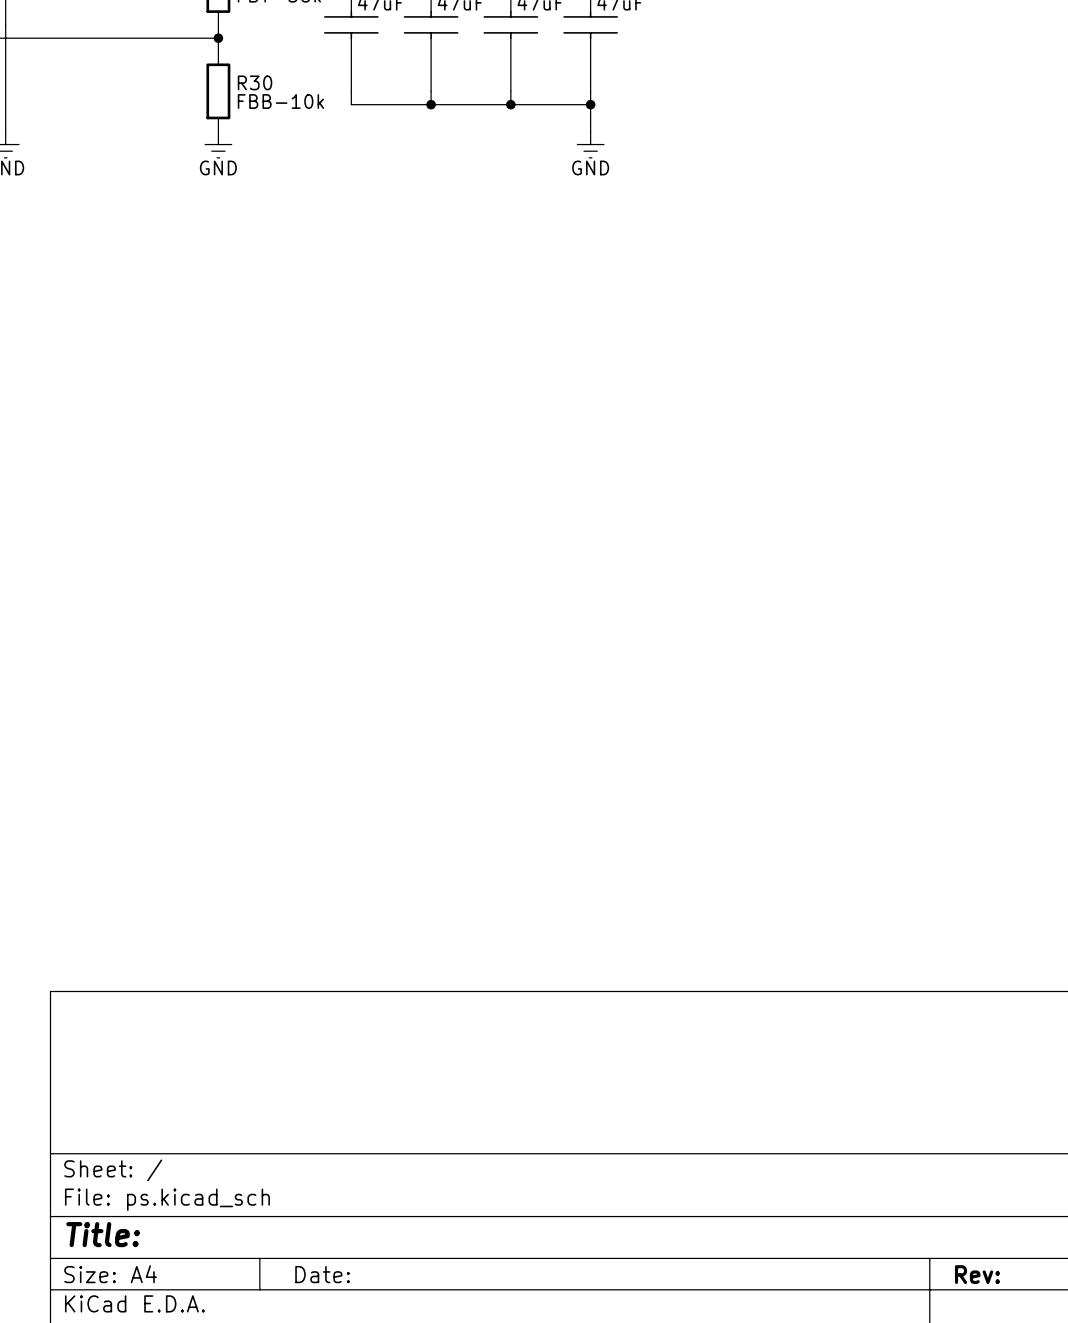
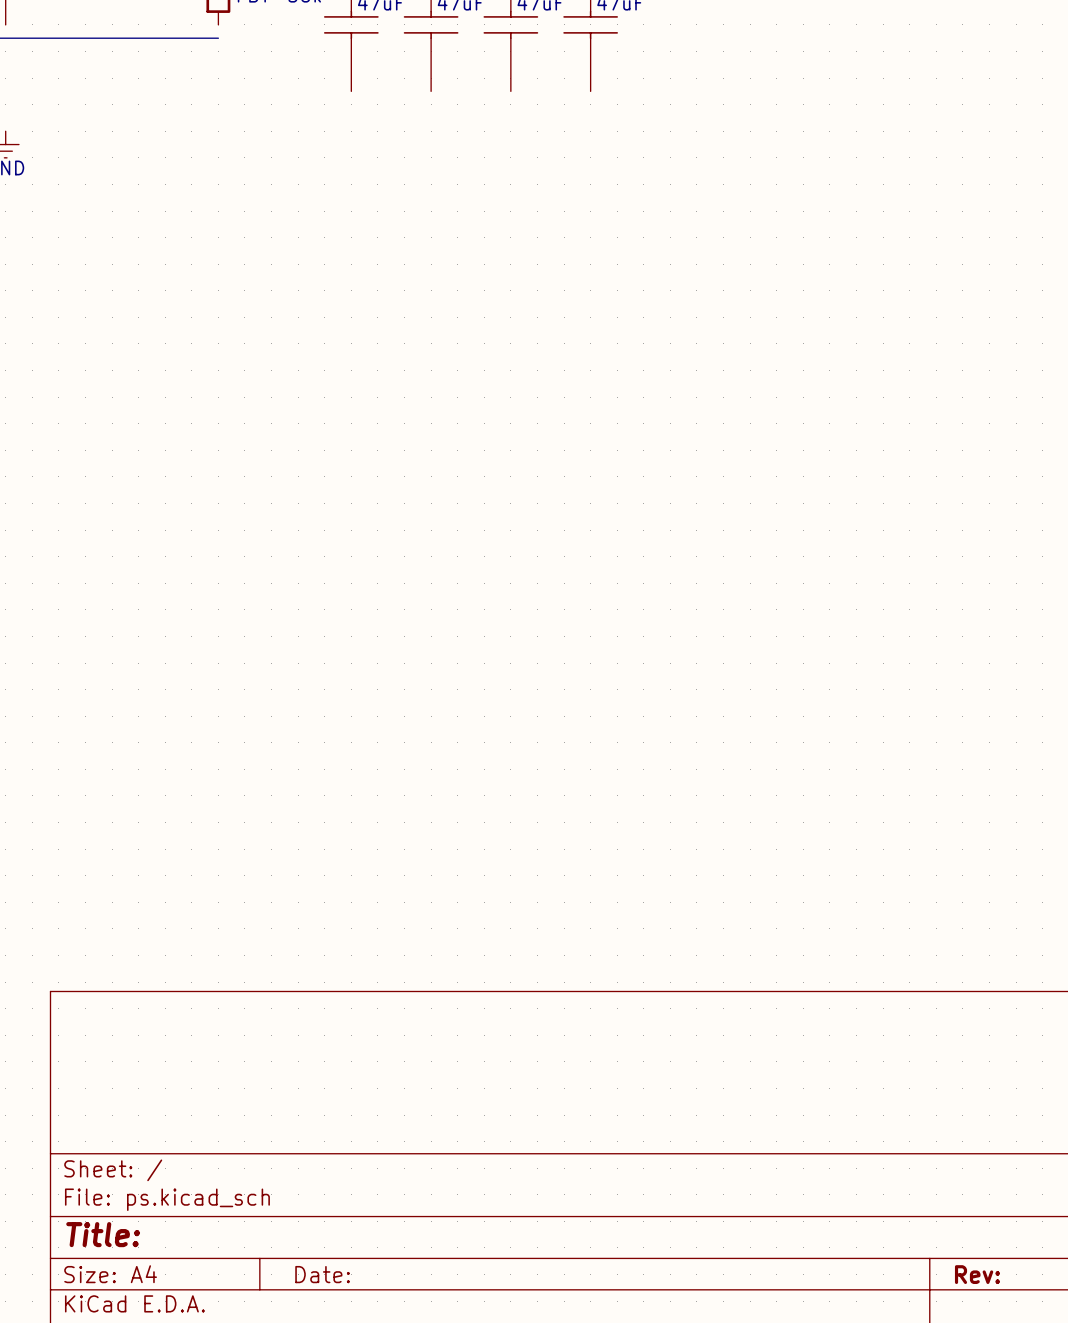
wire: (5, 24) (5, 131) -> none
wire: (218, 24) (218, 51) -> none
junction: (218, 38) -> none
R30: FBB-10k (218, 91) -> none
wire: (351, 91) (351, 104) (590, 104) -> none
wire: (431, 91) (431, 104) -> none
wire: (510, 91) (510, 104) -> none
wire: (590, 91) (590, 131) -> none
junction: (431, 104) -> none
junction: (510, 104) -> none
junction: (590, 104) -> none
power symbol: GND (218, 144) -> none
power symbol: GND (590, 144) -> none

